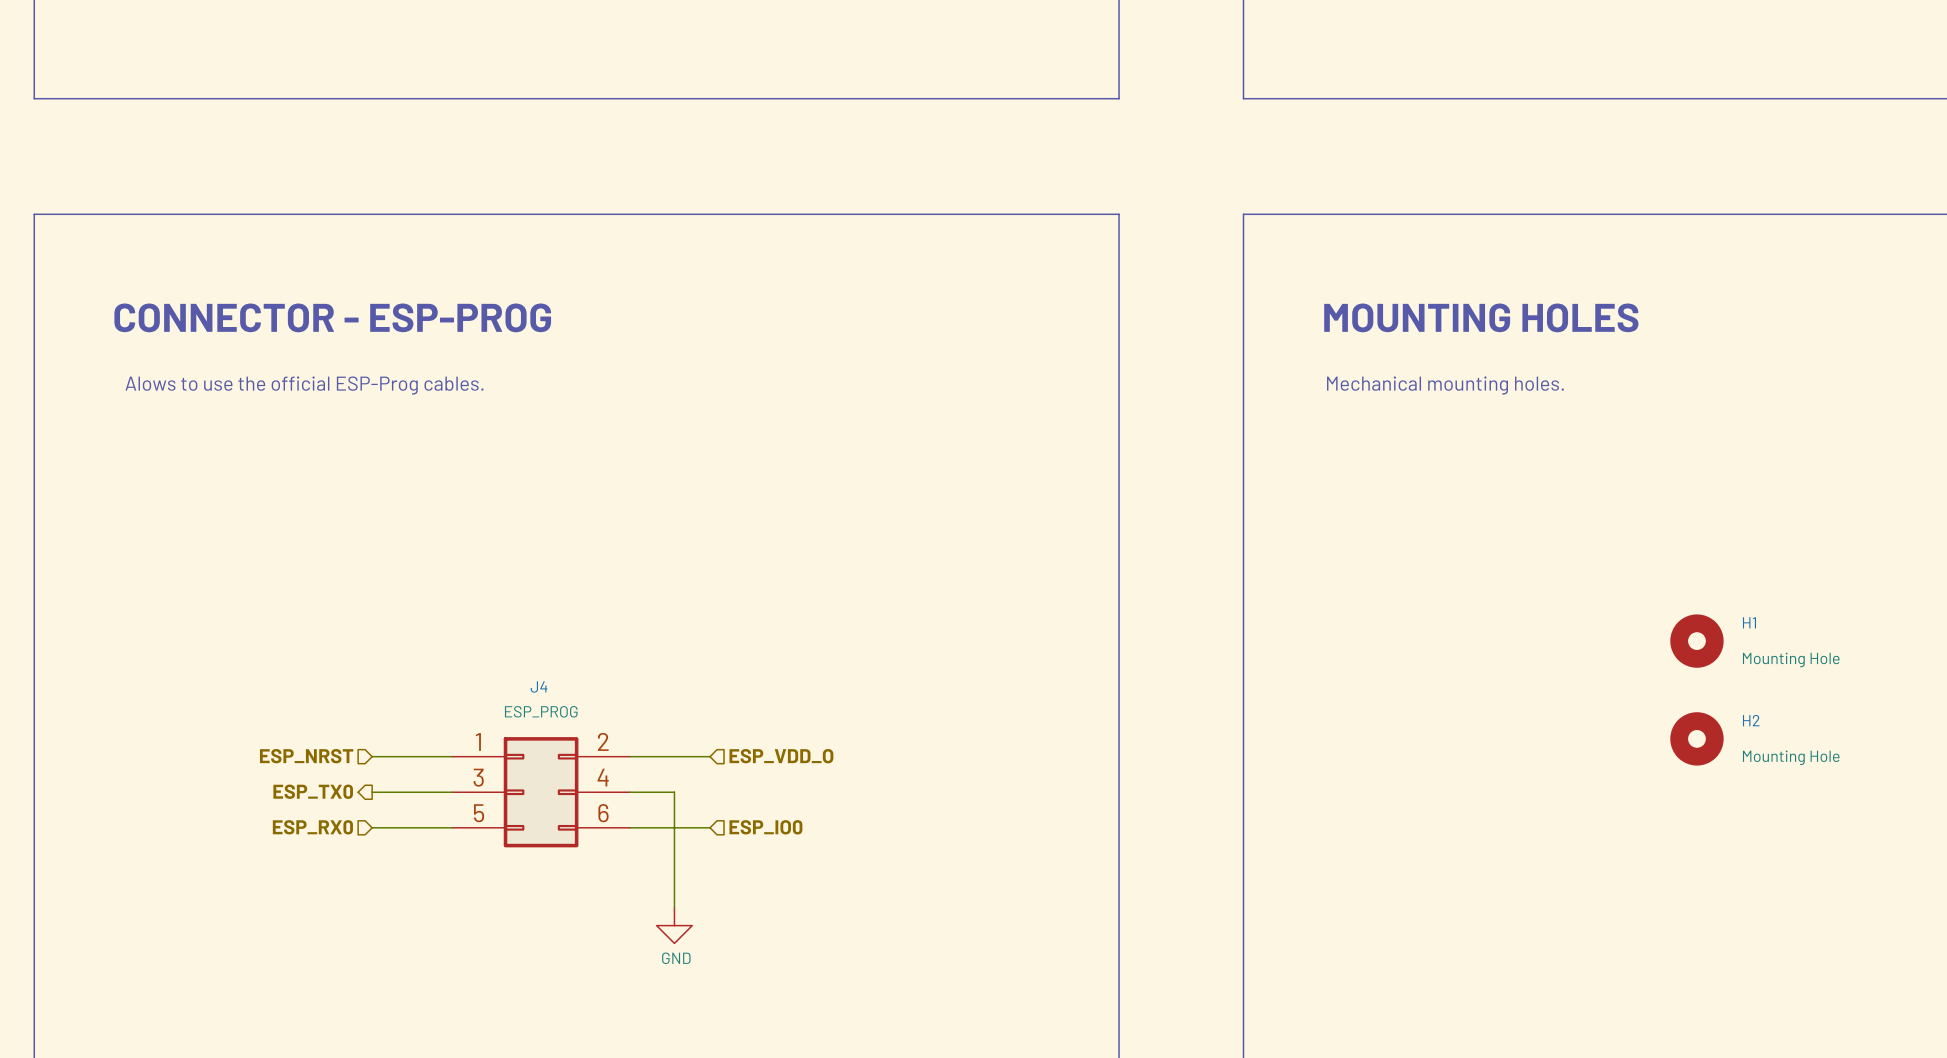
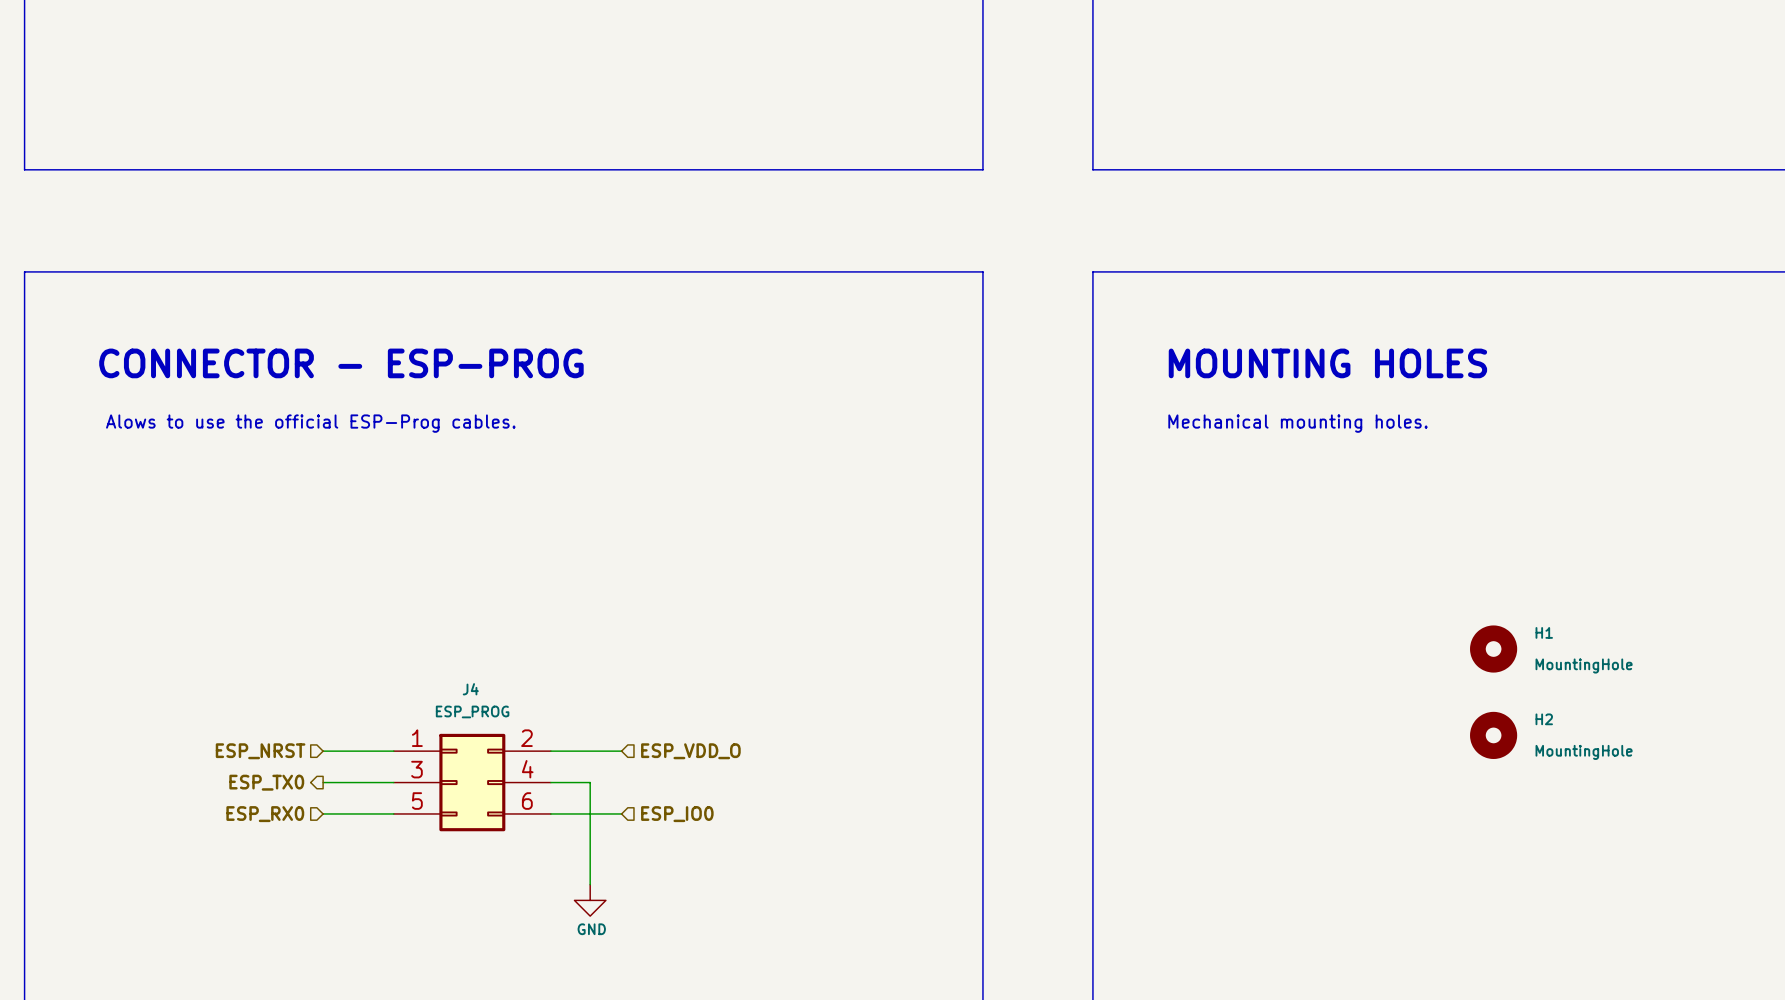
H1 value: Mounting Hole (1791, 659) -> MountingHole (1584, 666)
H2 value: Mounting Hole (1791, 757) -> MountingHole (1584, 752)

